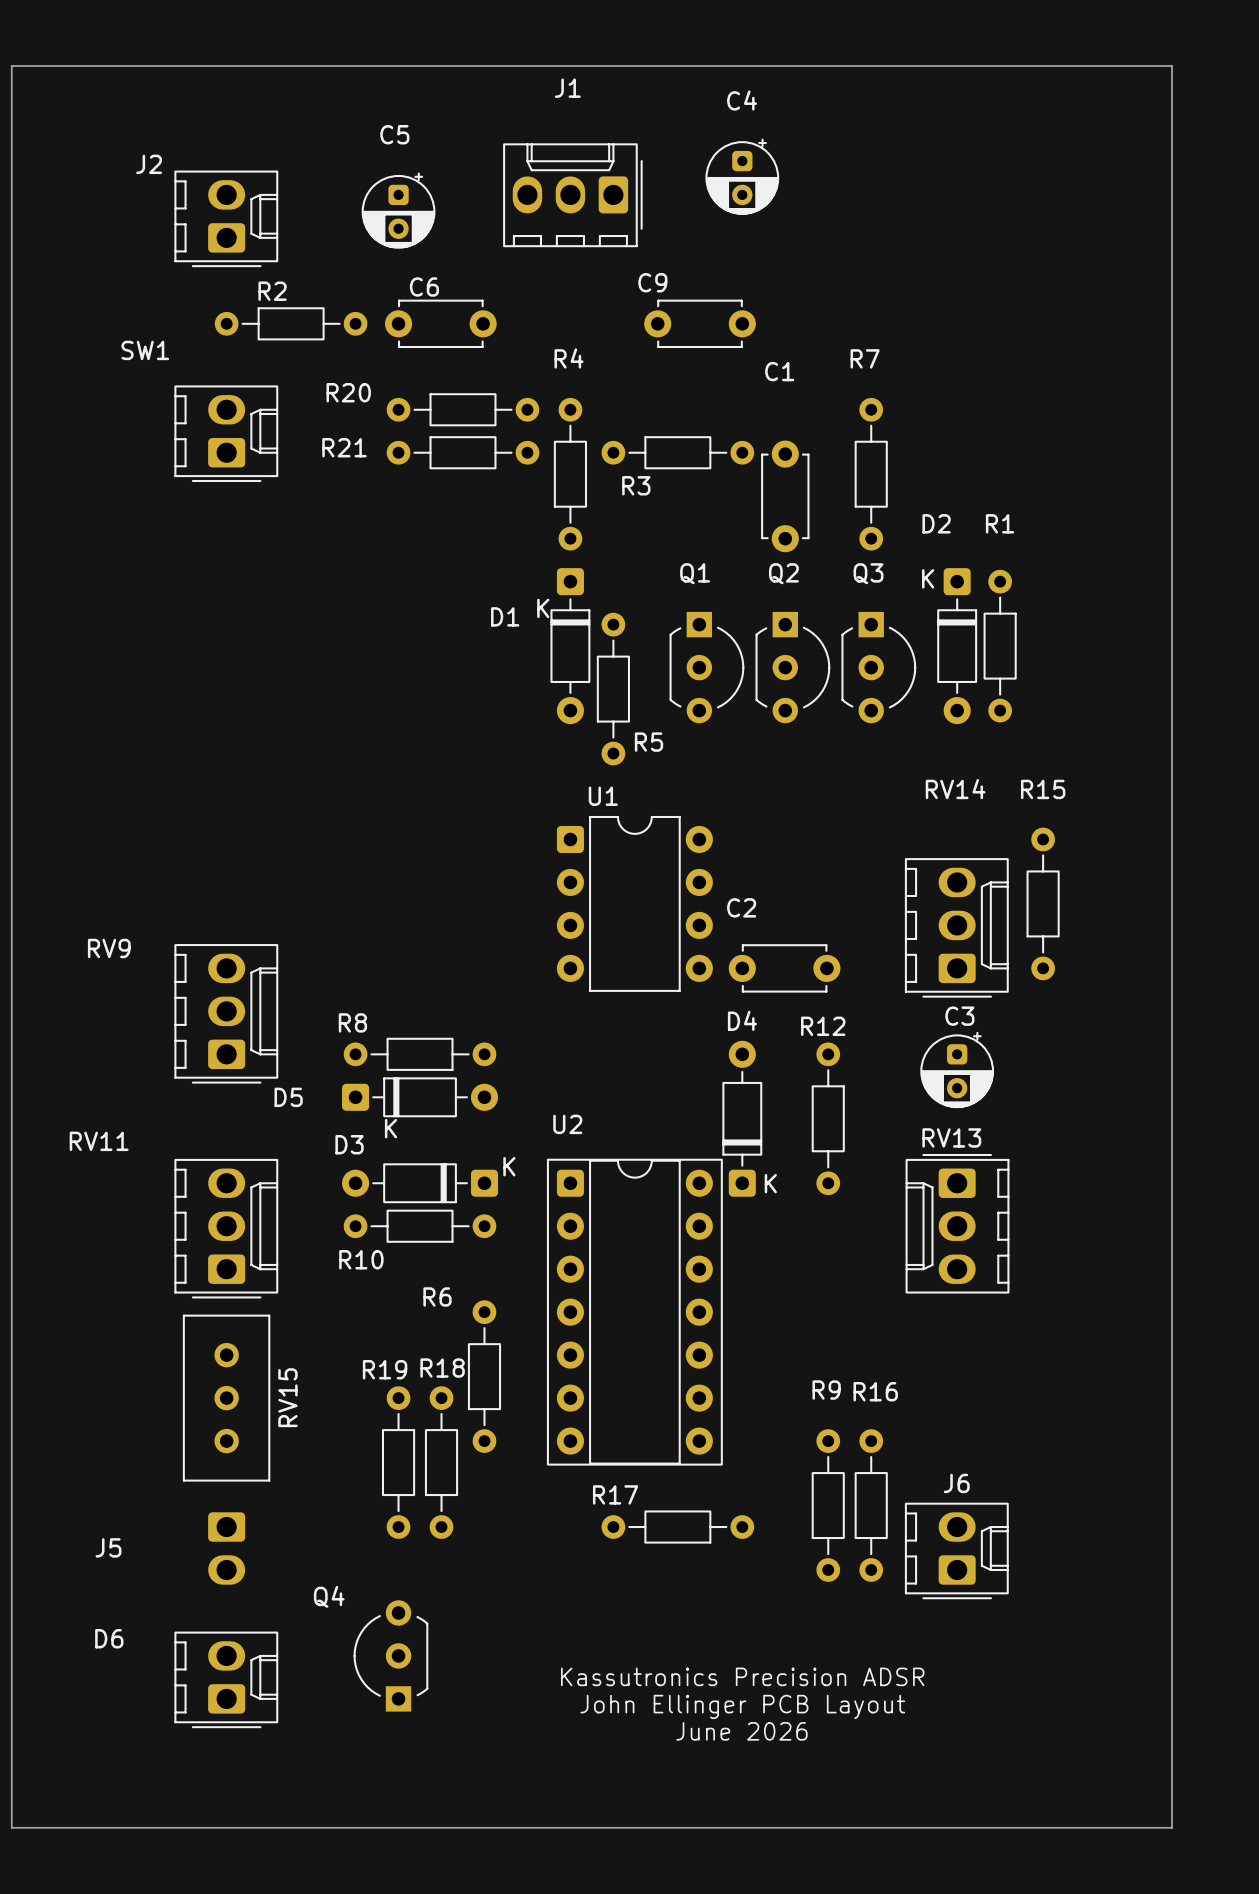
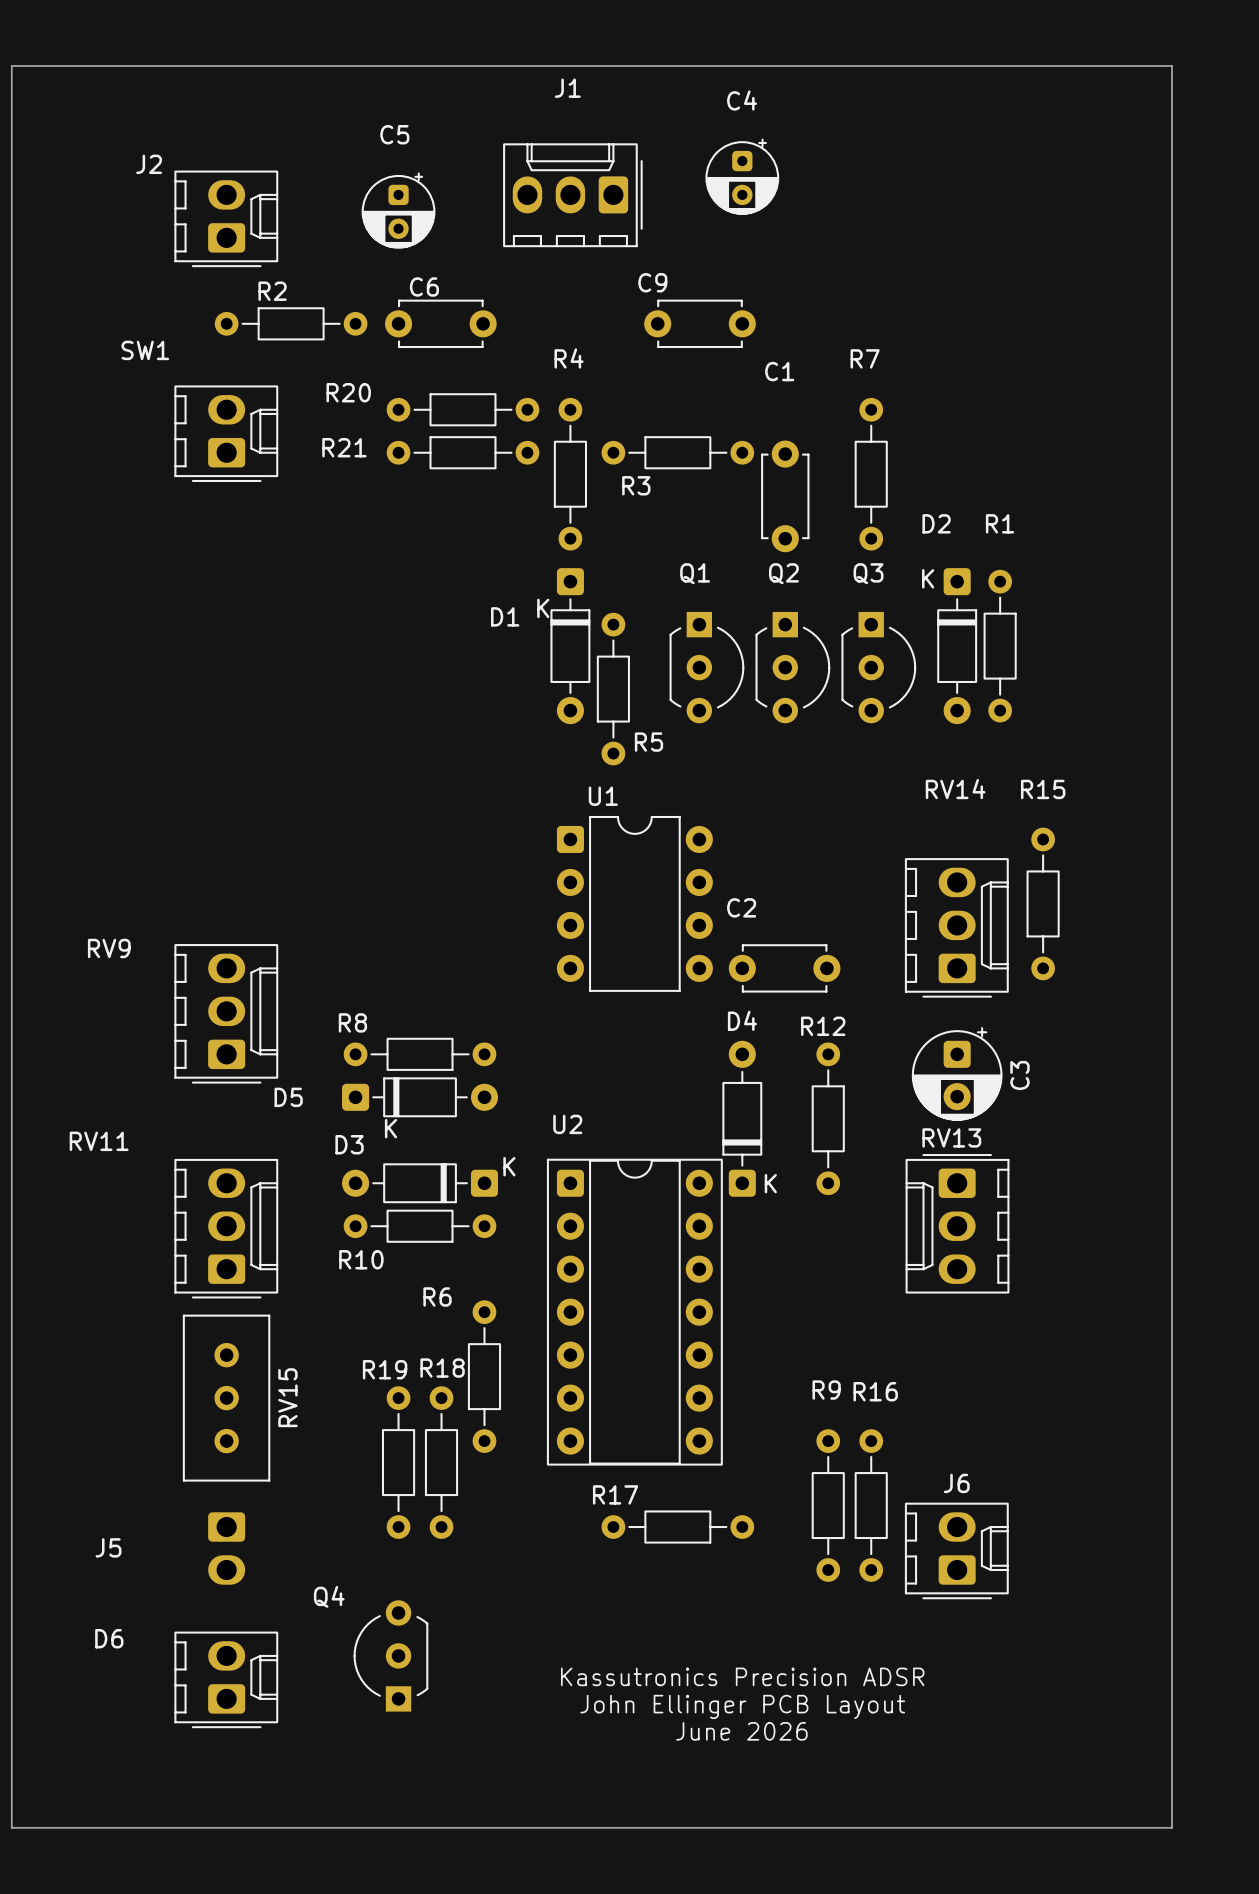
C3 name rotation: 0° (959, 1016) -> 90° counterclockwise (1019, 1075)
C3 name position: C3 (959, 1016) -> C3 (1019, 1075)
C3 footprint: [920, 1031, 995, 1109] -> [911, 1027, 1003, 1121]

